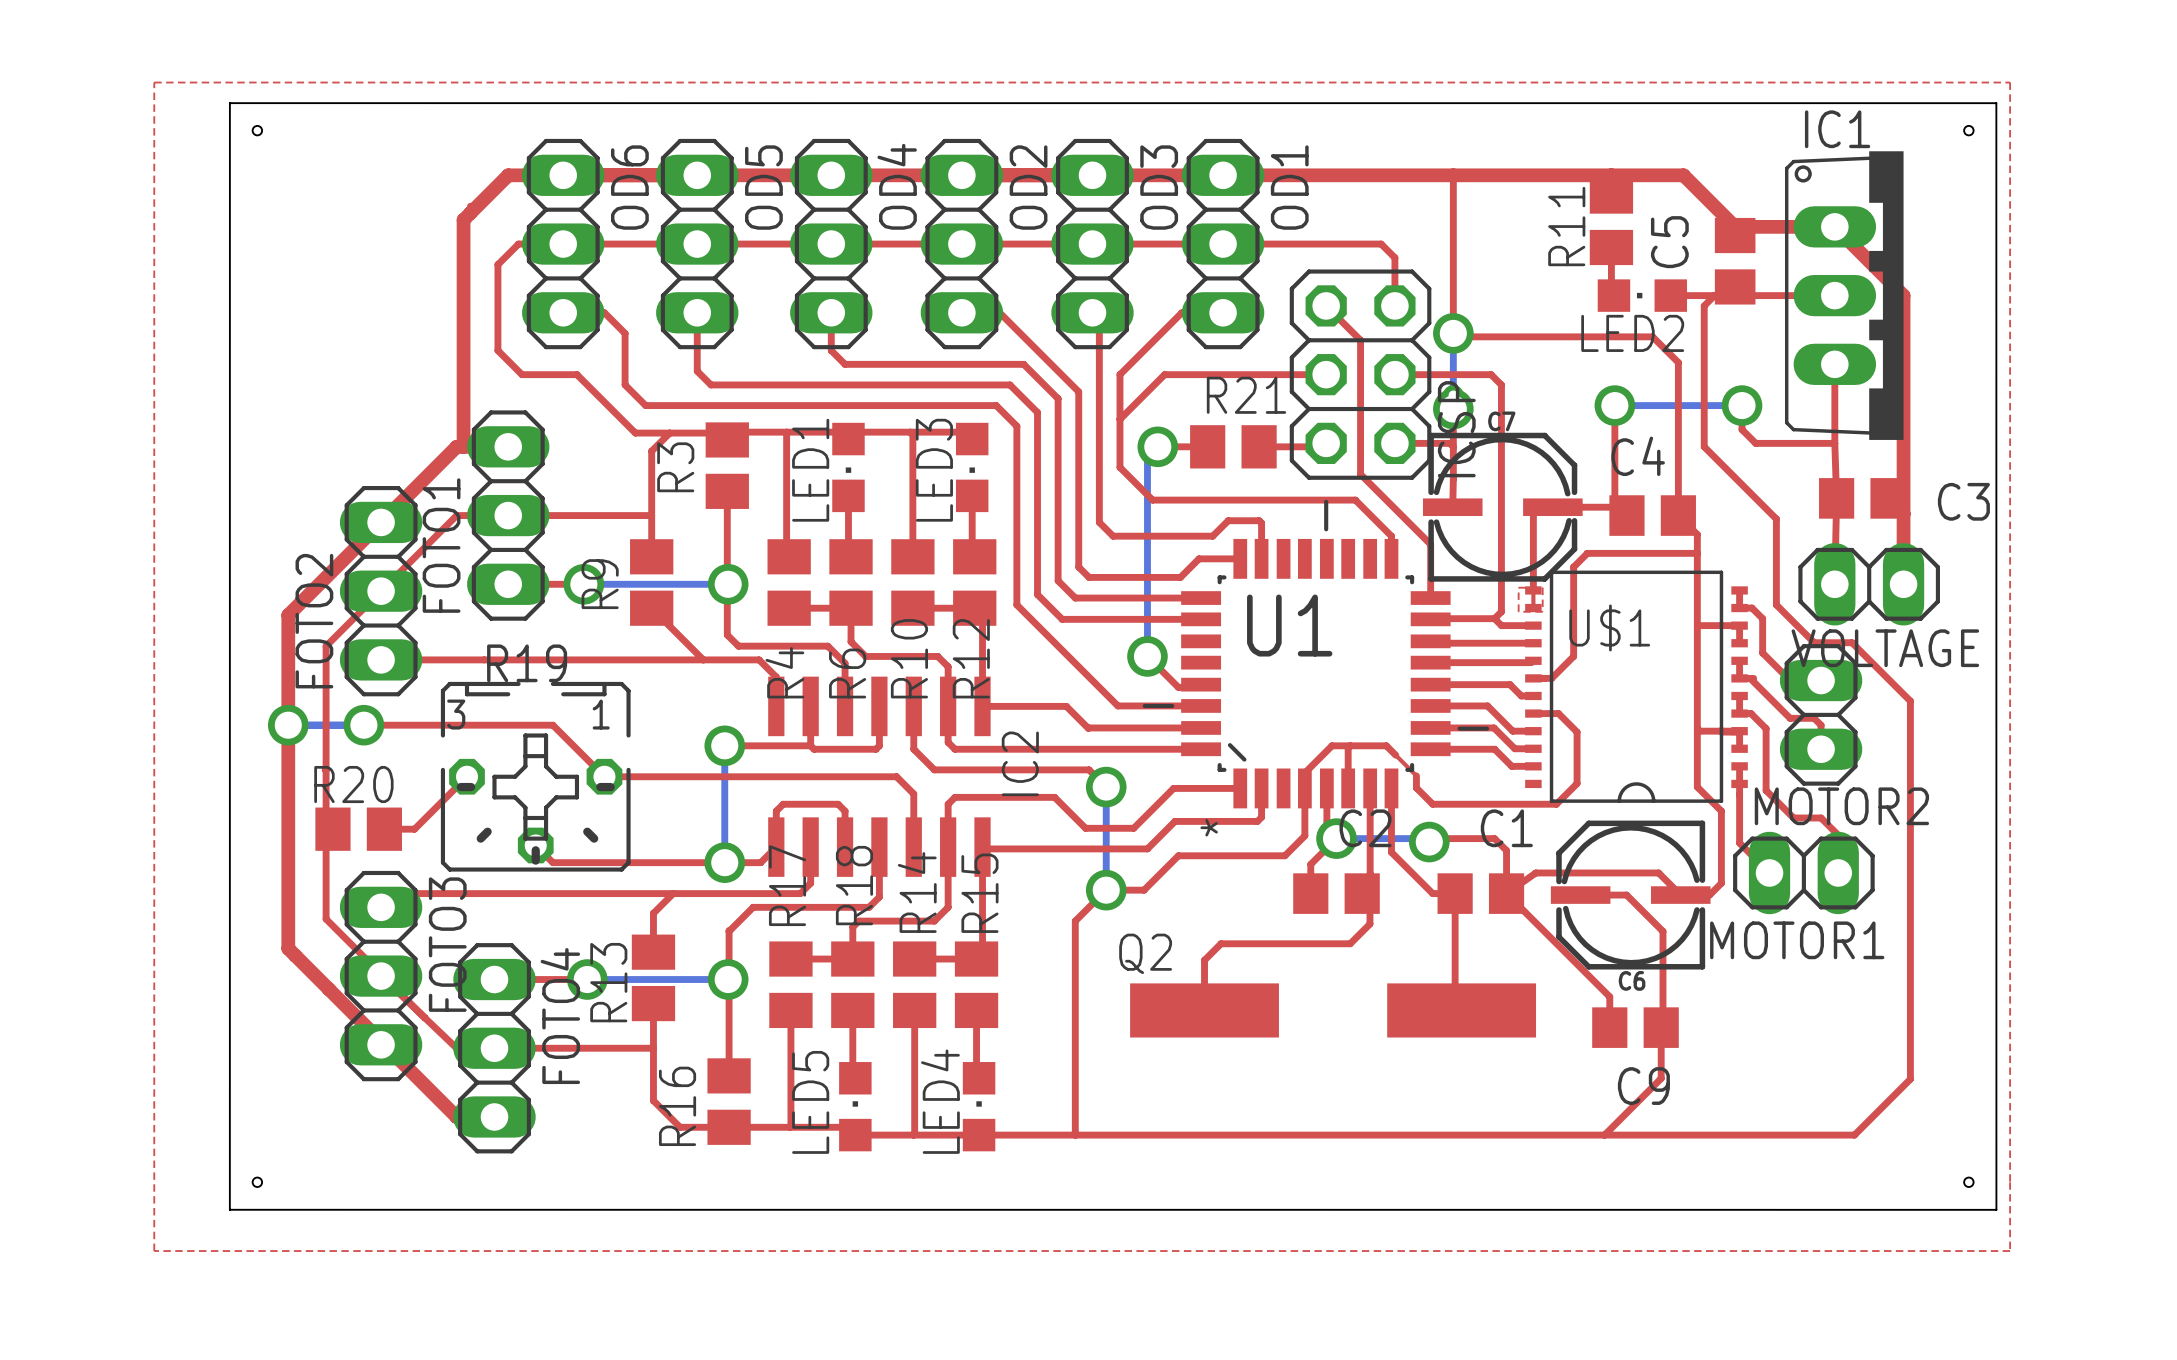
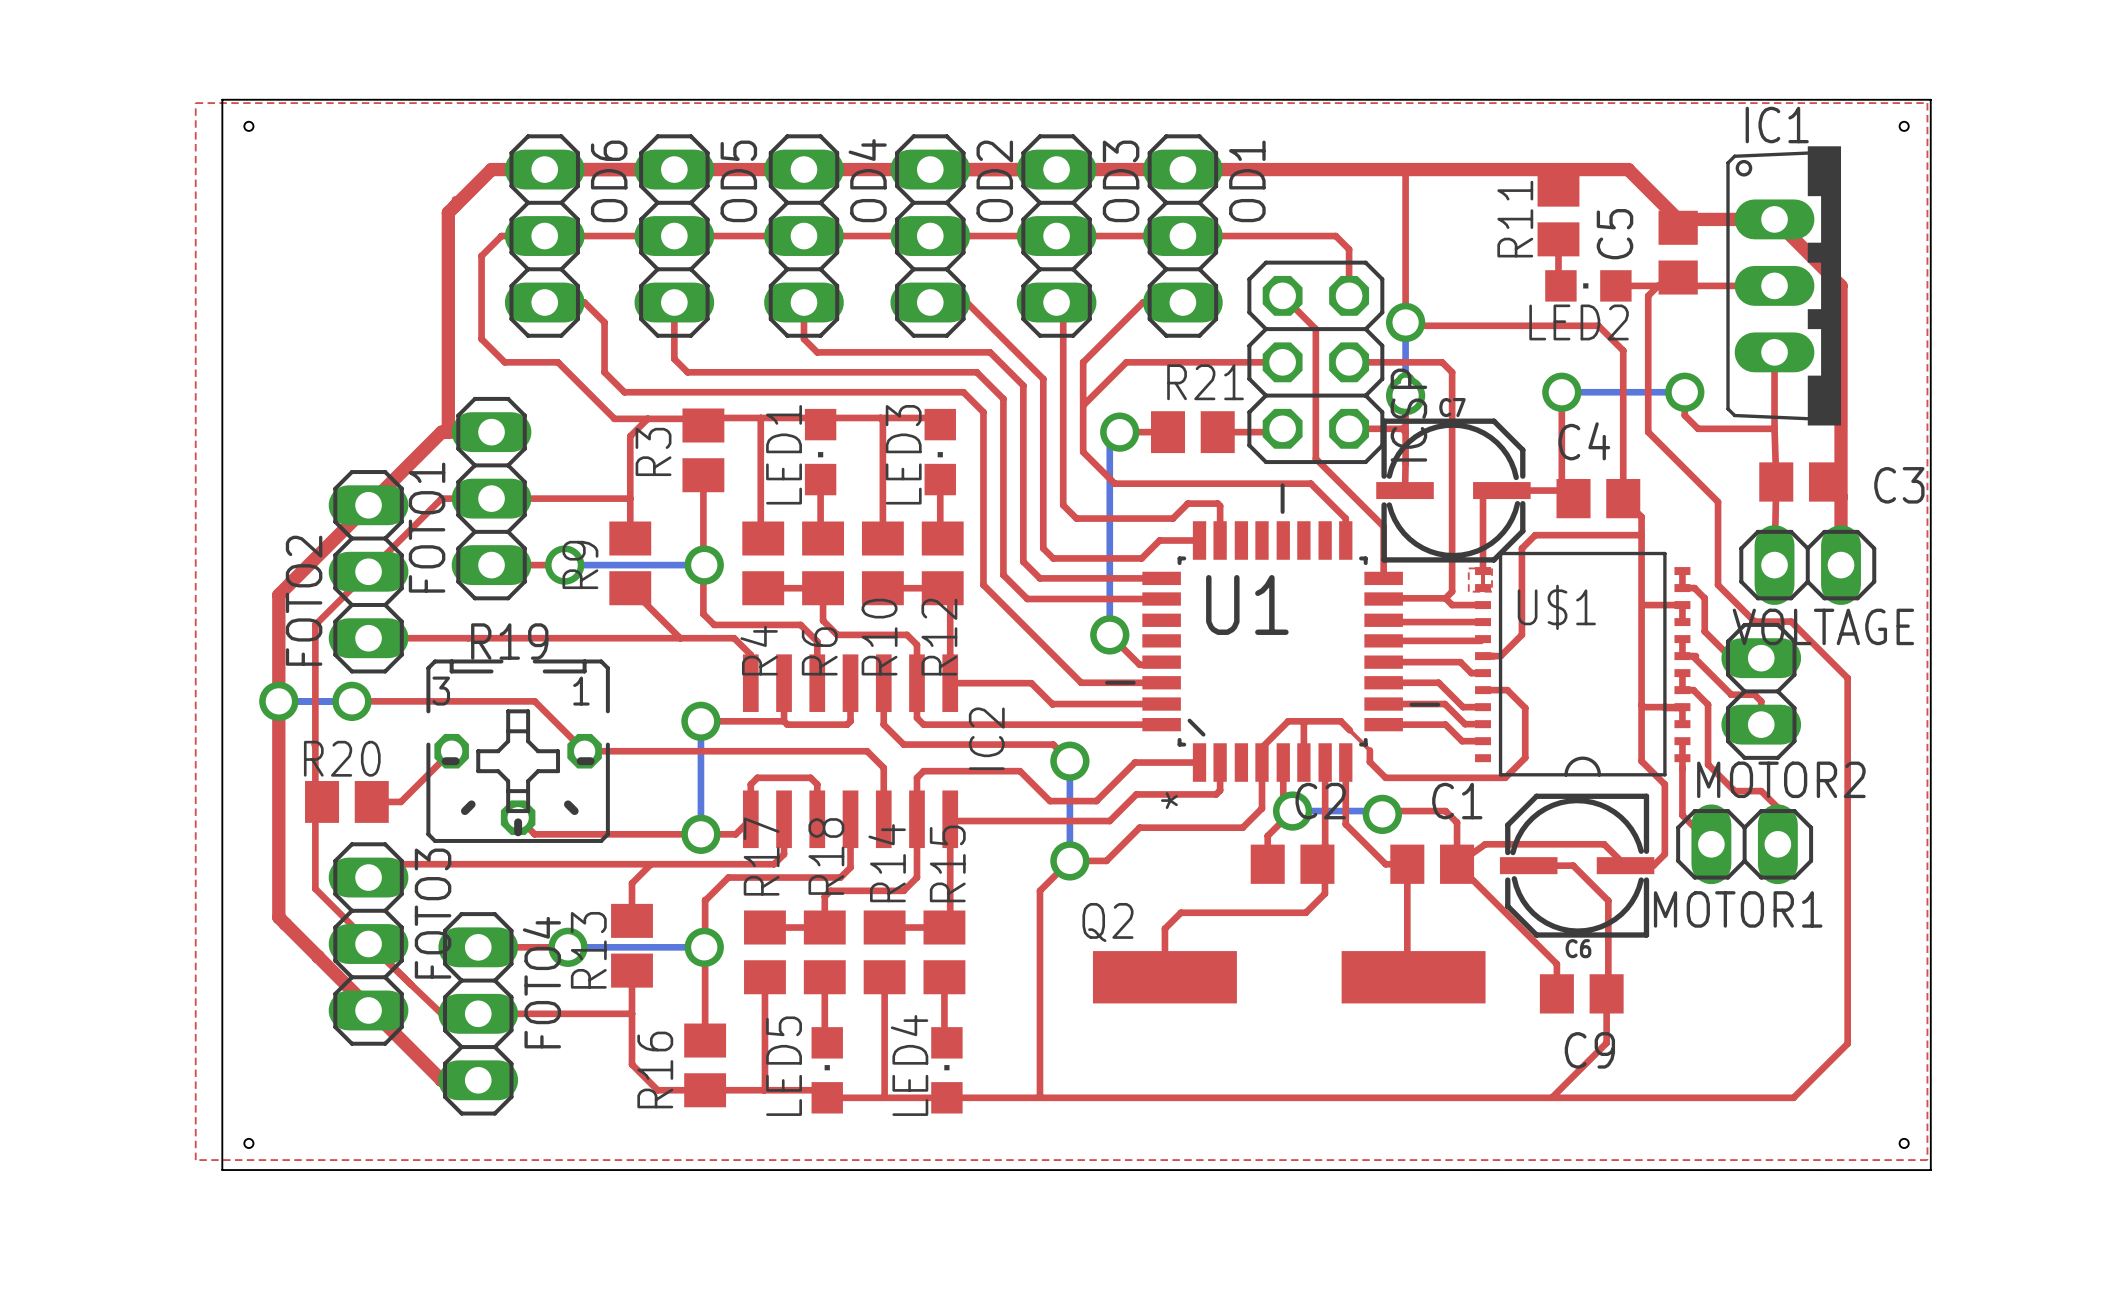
top zone outline: (154, 82) (2010, 82) (2010, 1251) (154, 1251) (154, 82) -> (195, 103) (195, 1160) (1927, 1160) (1927, 103) (195, 103)

